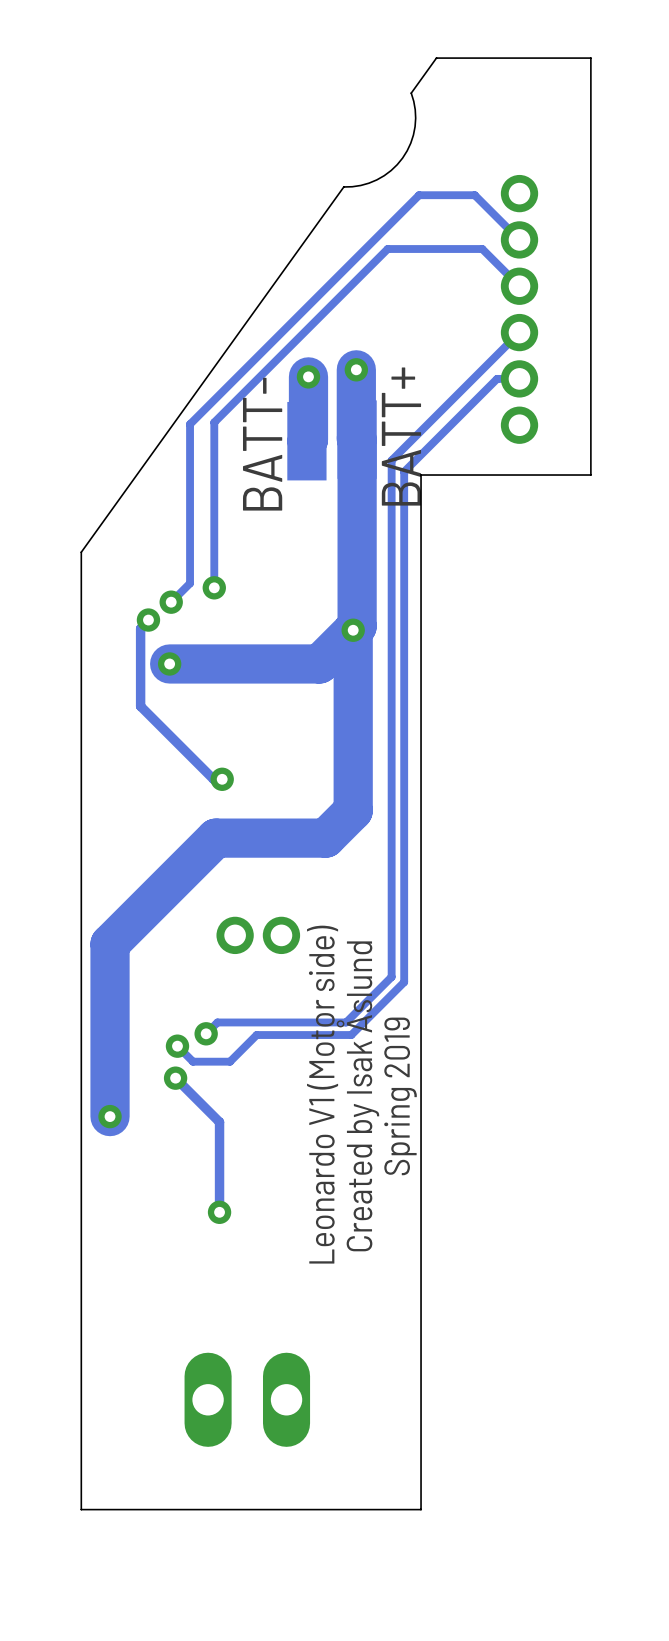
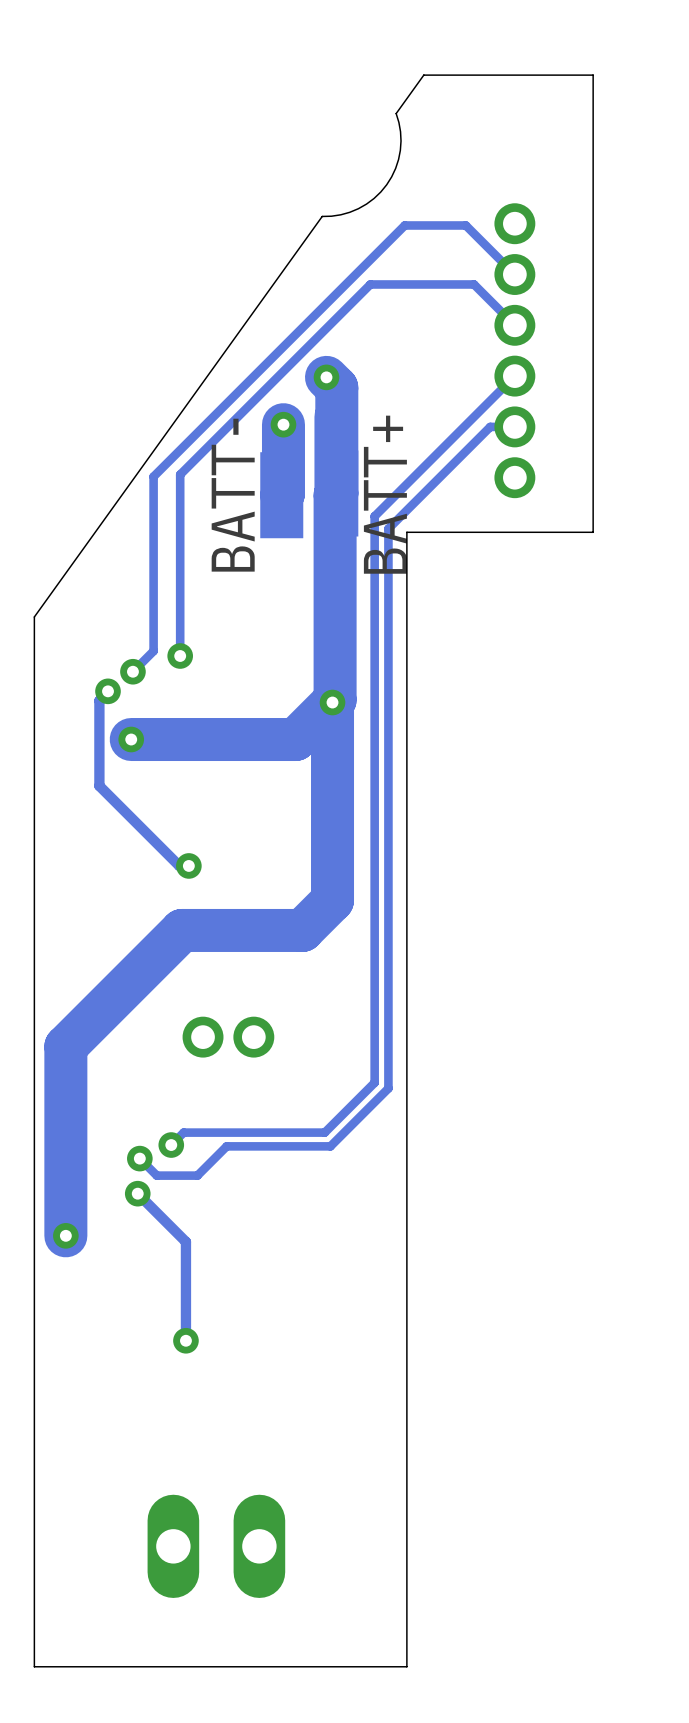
via position: (356, 369) -> (326, 377)
track: (357, 439) (357, 626) (355, 627) -> (326, 377) (336, 387) (335, 699)
text: Leonardo V1 (Motor side) (322, 1094) -> none
text: Created by Isak Åslund (357, 1096) -> none
text: Spring 2019 (400, 1096) -> none

